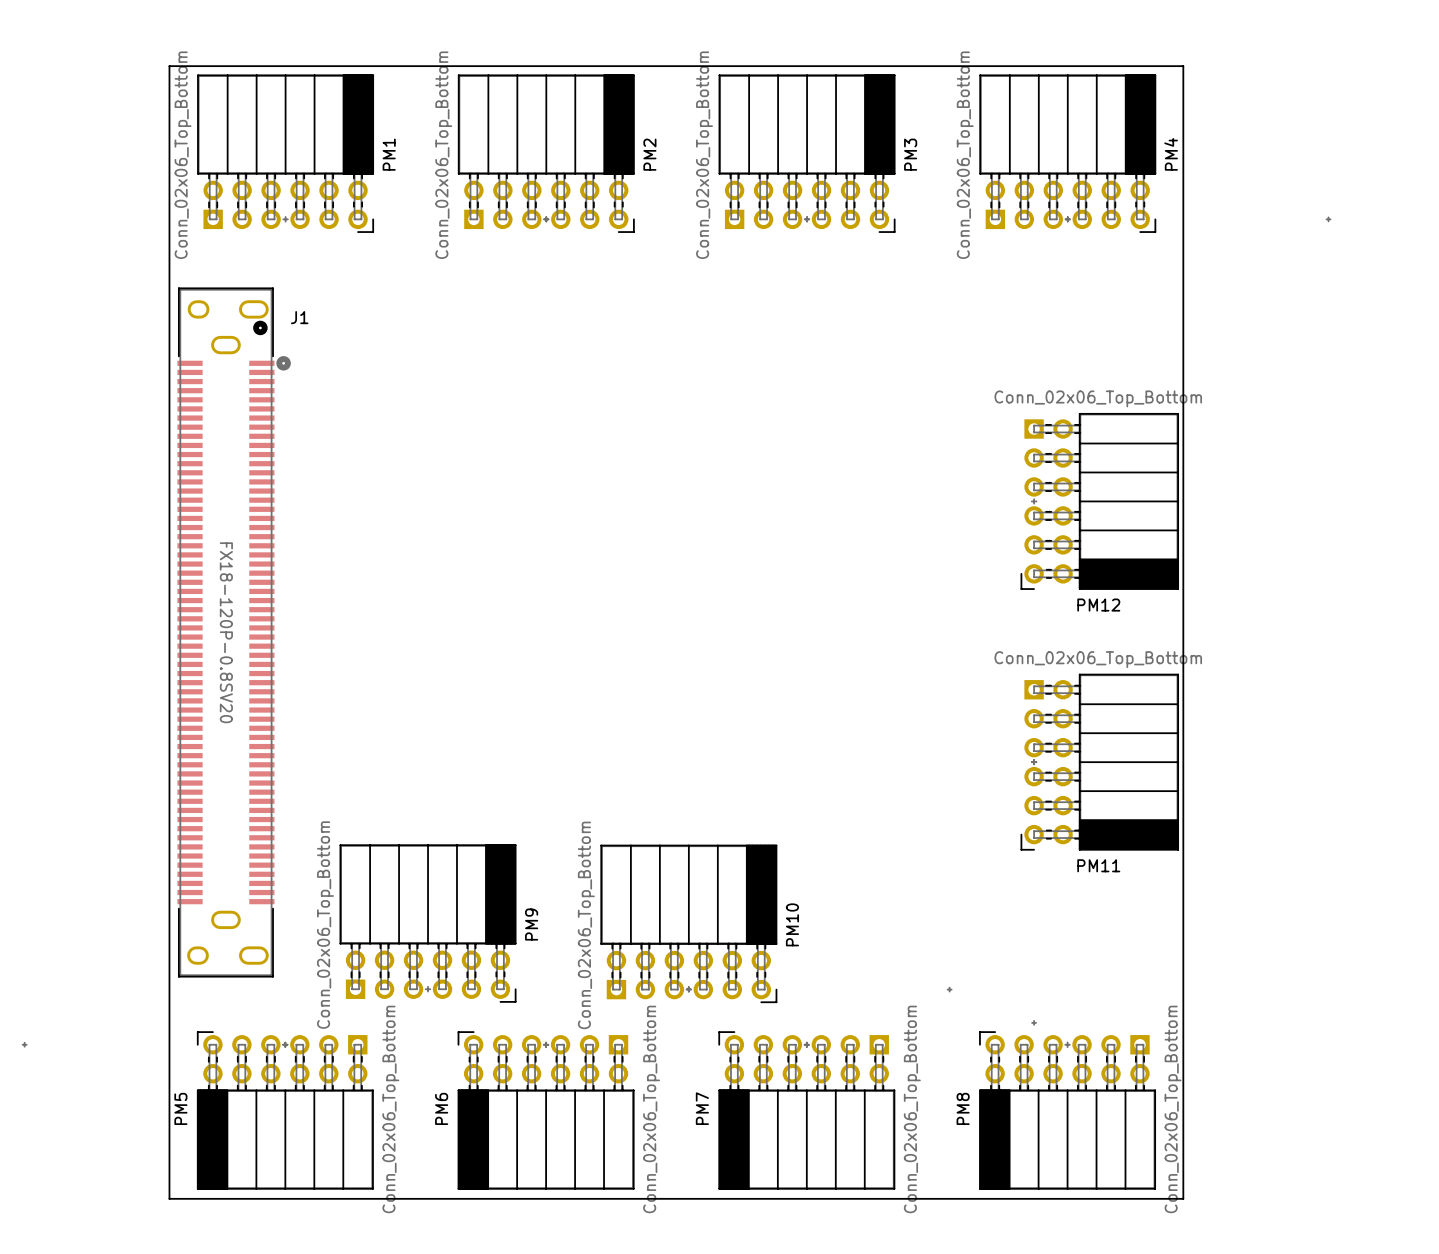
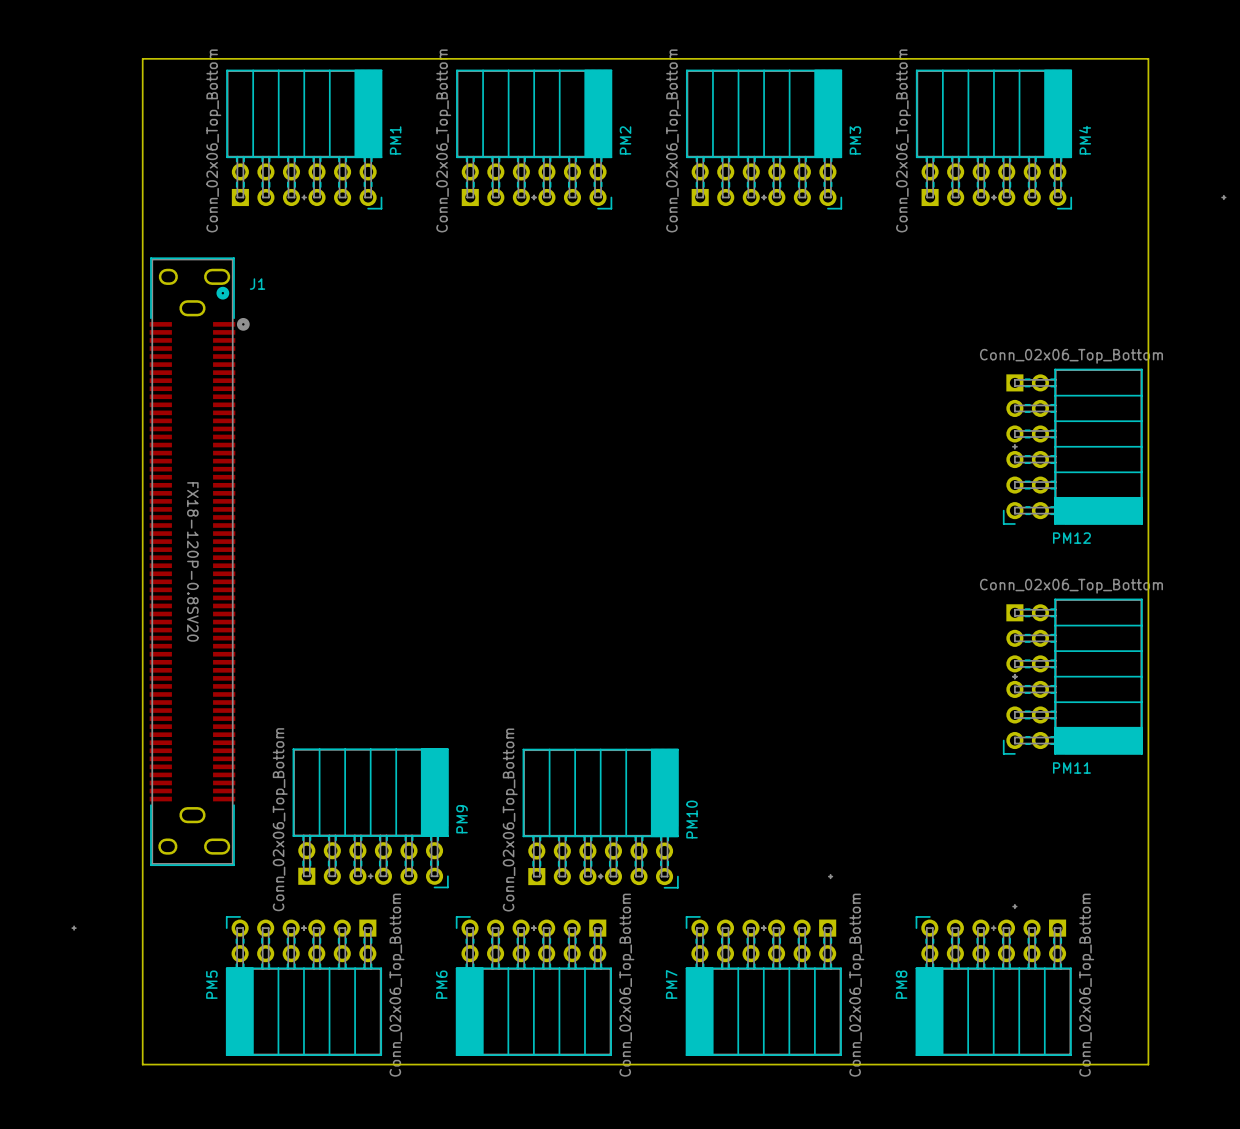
board edge: (169, 66) (1183, 66) (1183, 1198) (169, 1198) -> (142, 62) (142, 58) (1148, 58) (1148, 1064) (142, 1064) (142, 1061)
PM1 position: (373, 153) -> (381, 139)
PM2 position: (633, 153) -> (611, 139)
PM3 position: (894, 153) -> (841, 139)
PM4 position: (1155, 153) -> (1071, 139)
PM12 position: (1099, 588) -> (1072, 523)
PM11 position: (1099, 849) -> (1072, 753)
PM5 position: (197, 1110) -> (226, 986)
PM6 position: (458, 1110) -> (456, 986)
PM7 position: (719, 1110) -> (686, 986)
PM8 position: (980, 1110) -> (916, 986)

